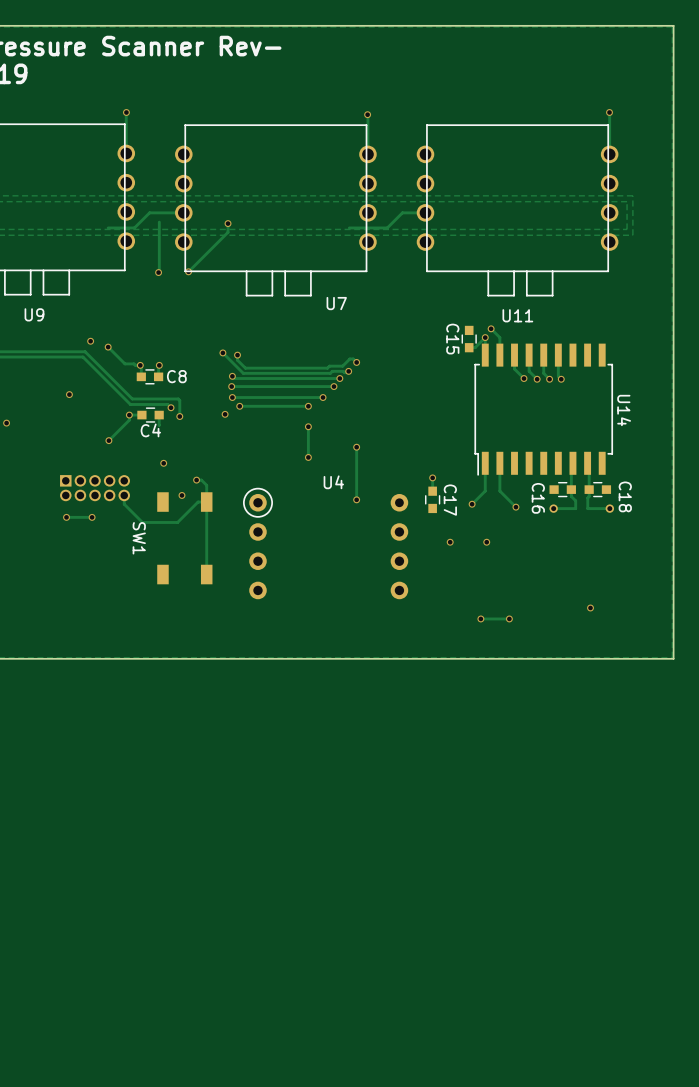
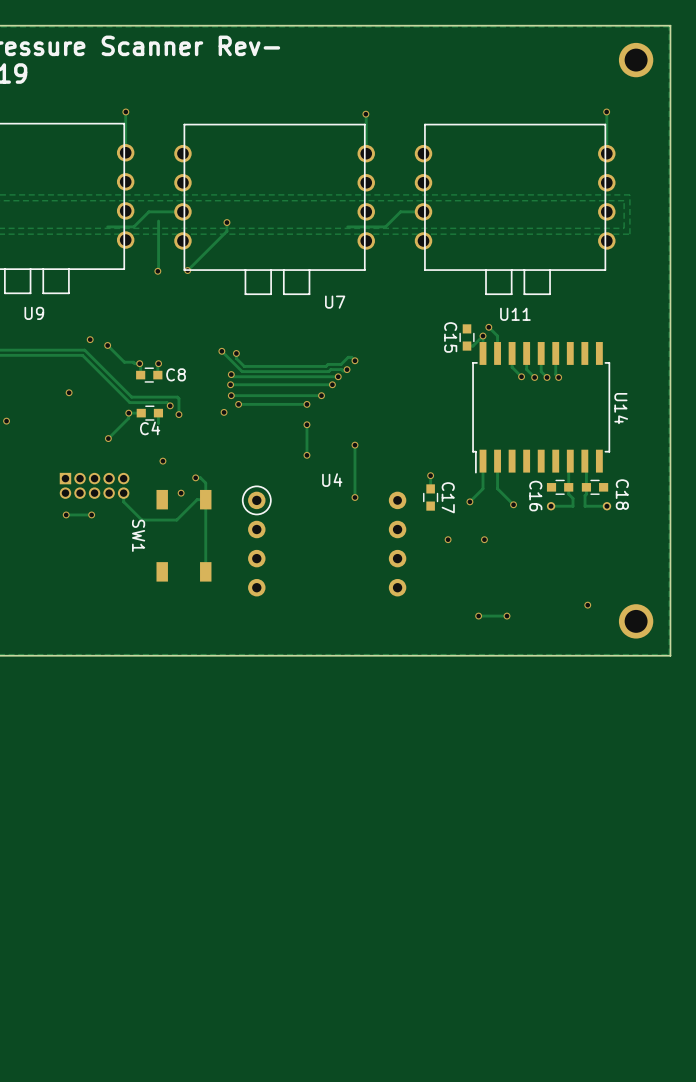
part: none -> (636, 60)
part: none -> (636, 621)

